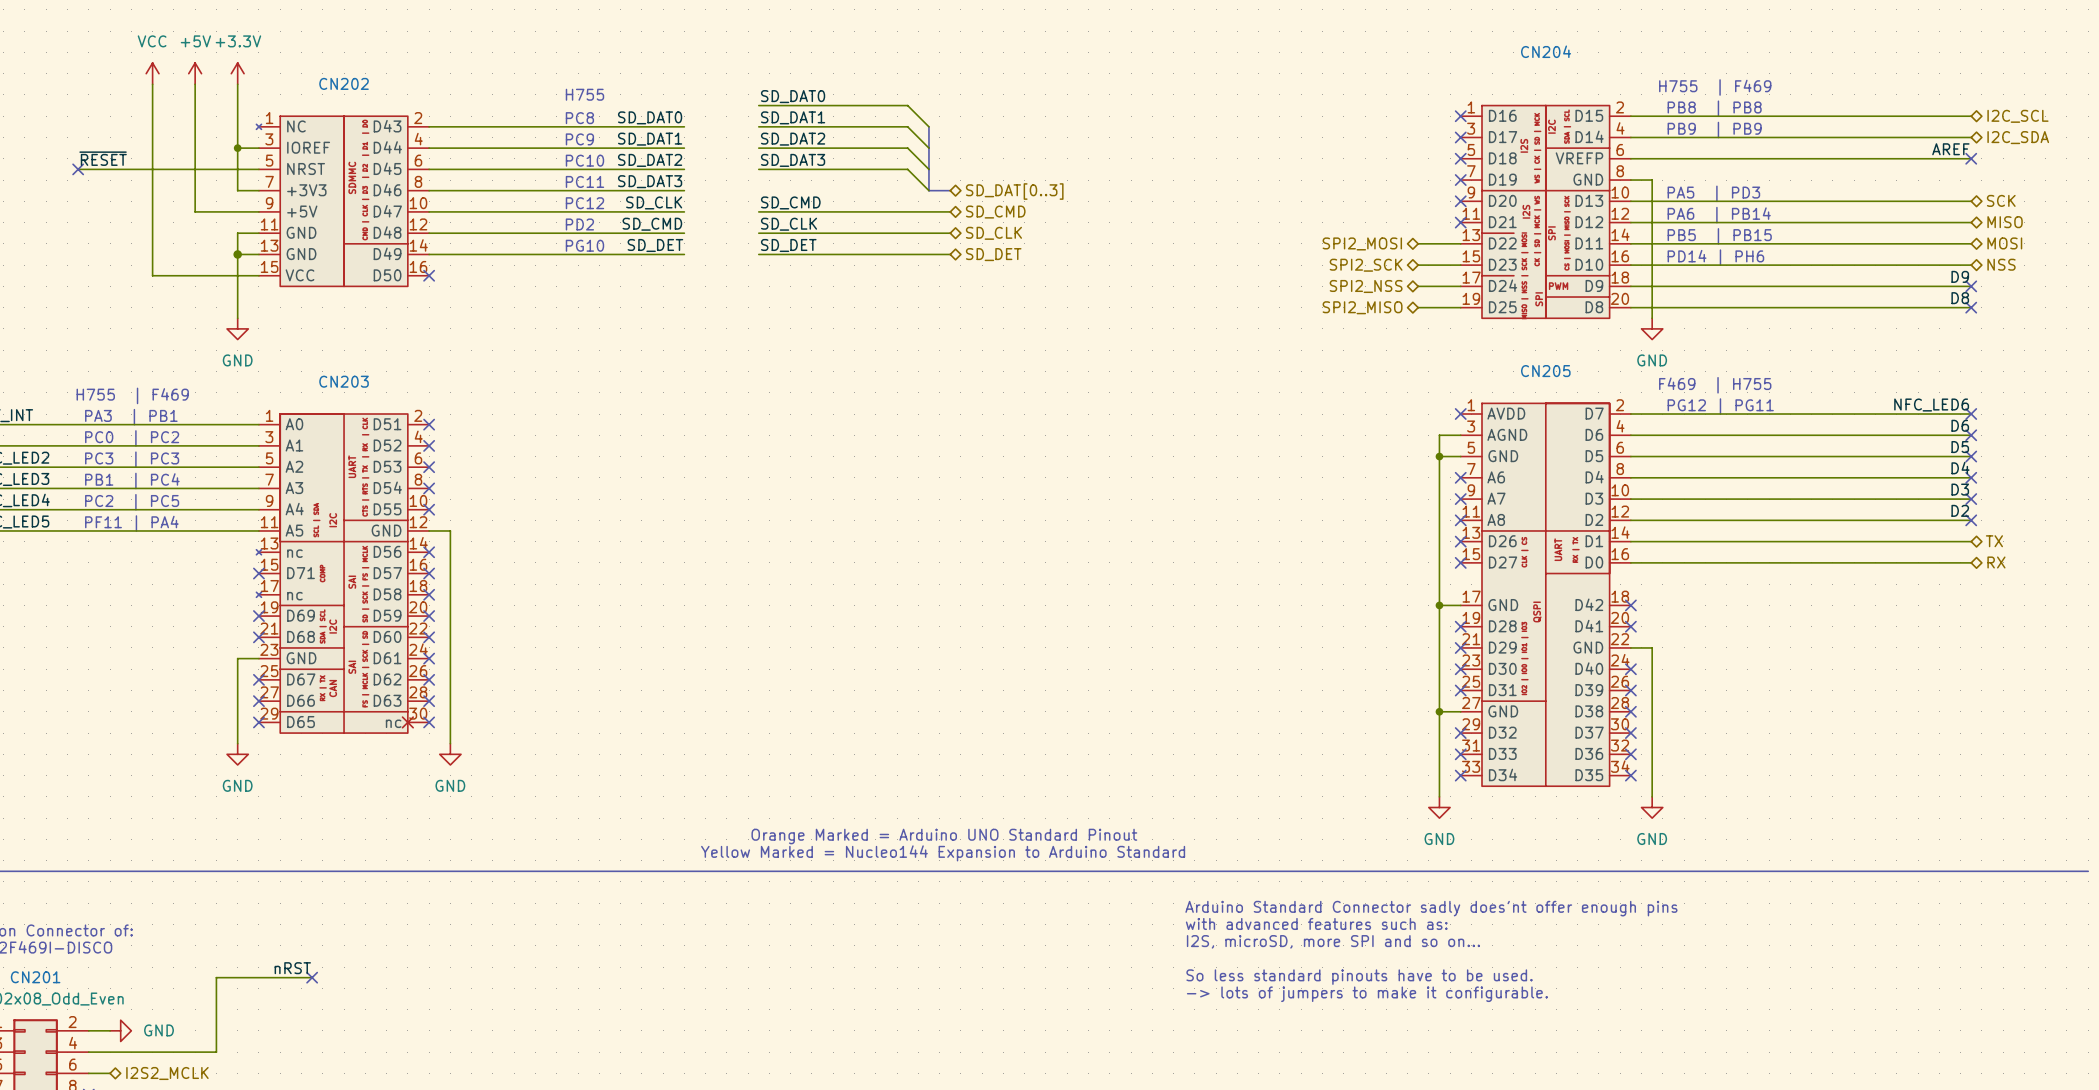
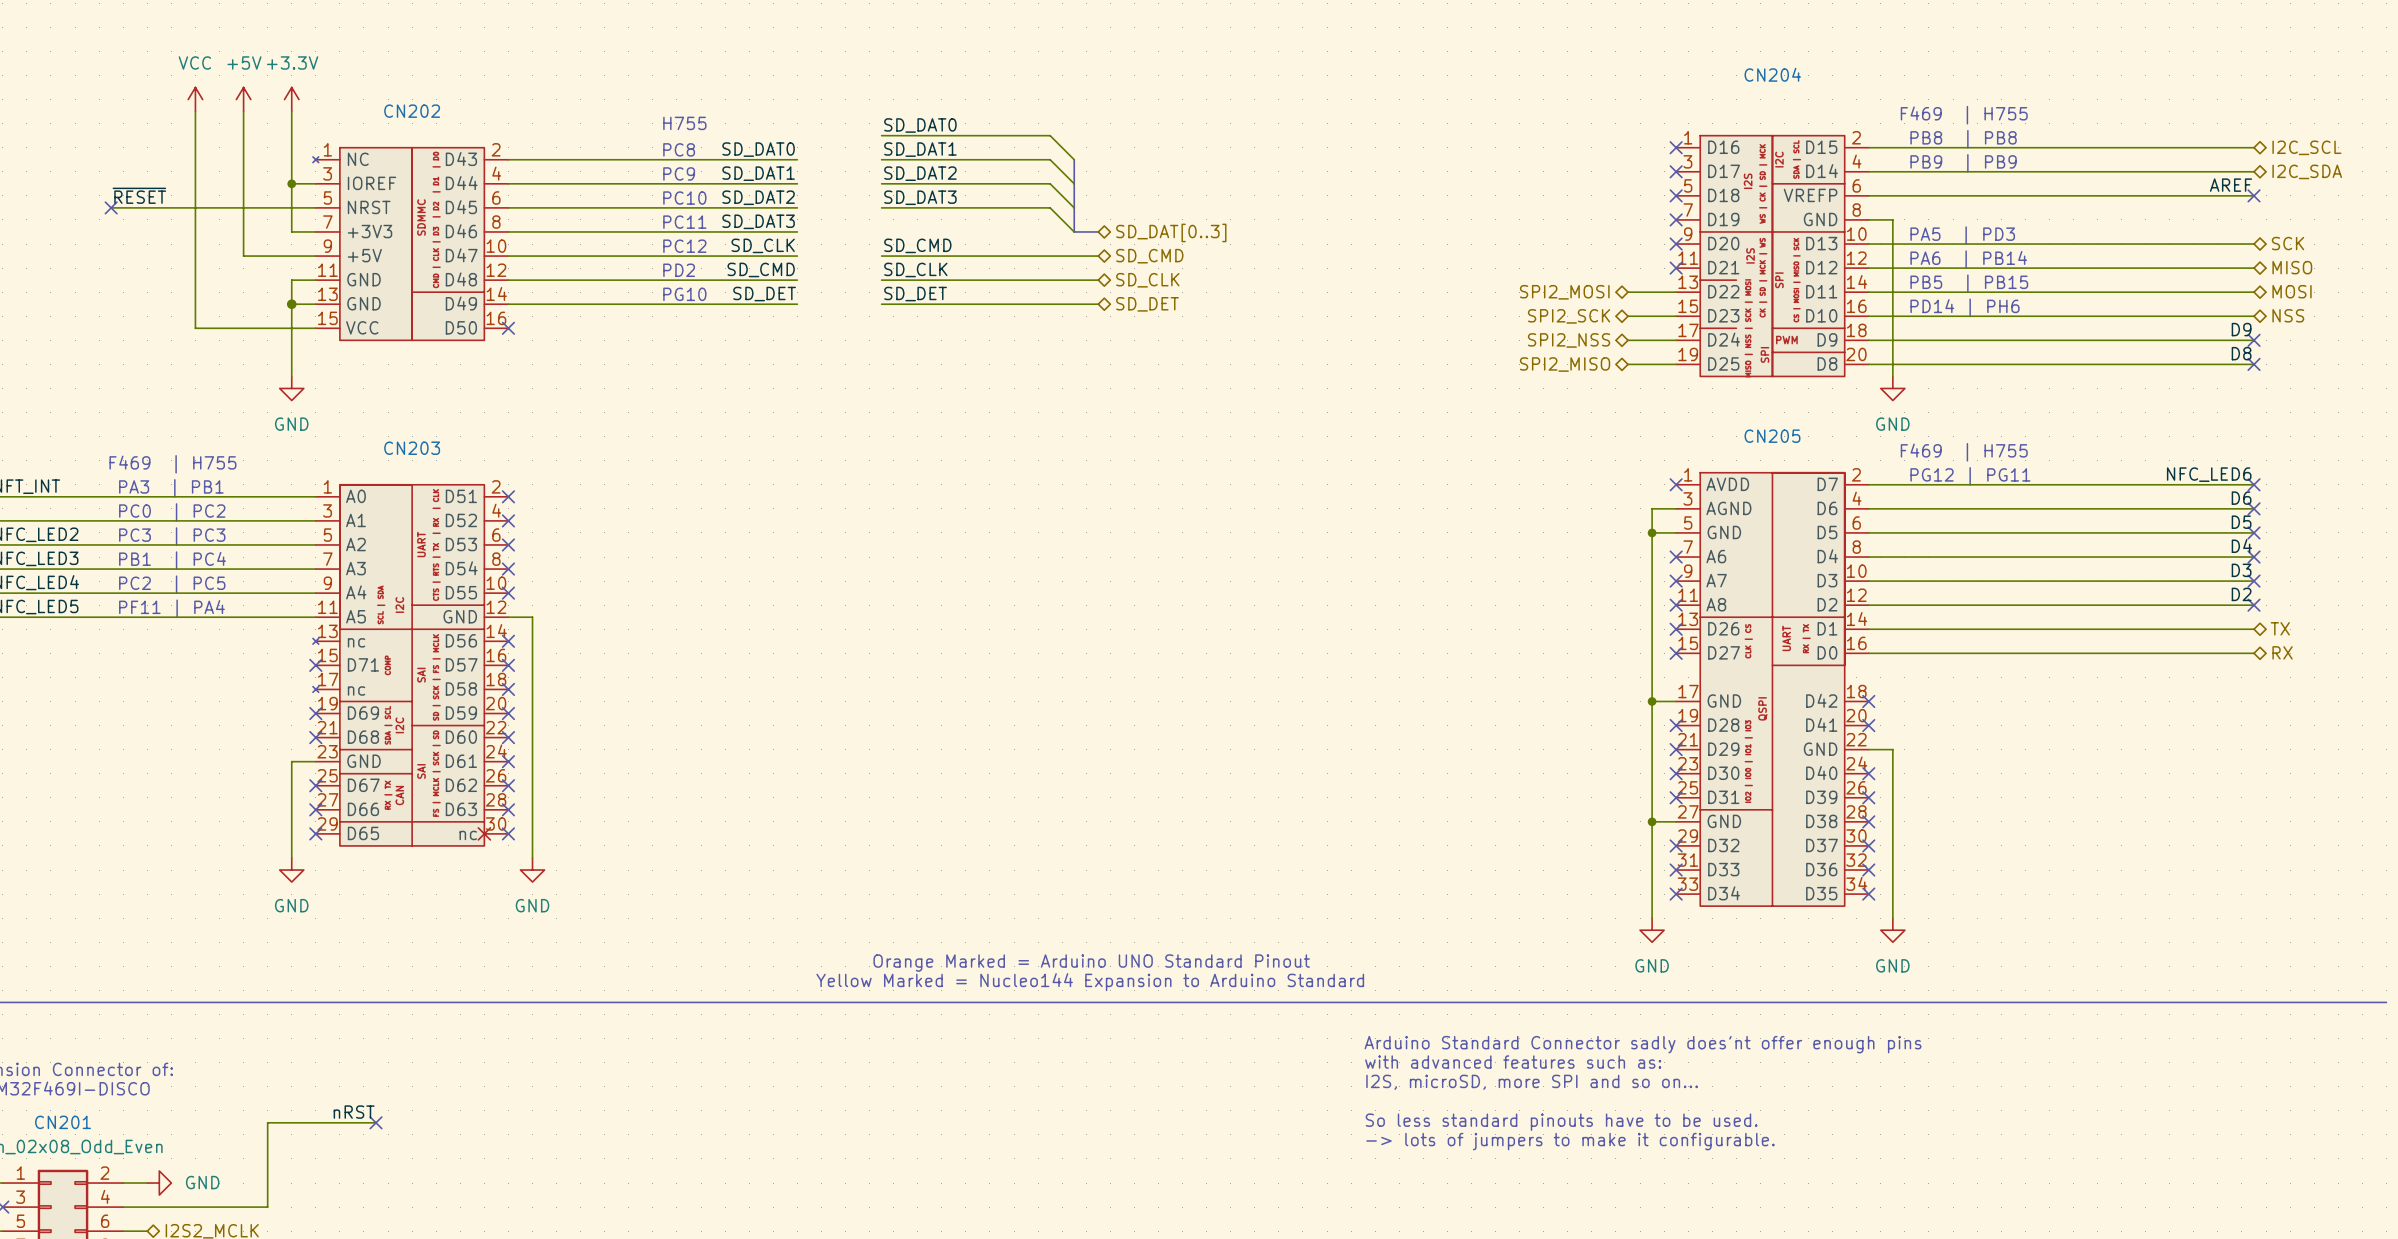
text: H755 | F469 (1715, 87) -> F469 | H755 (1964, 115)
text: H755 | F469 (132, 395) -> F469 | H755 (172, 464)

